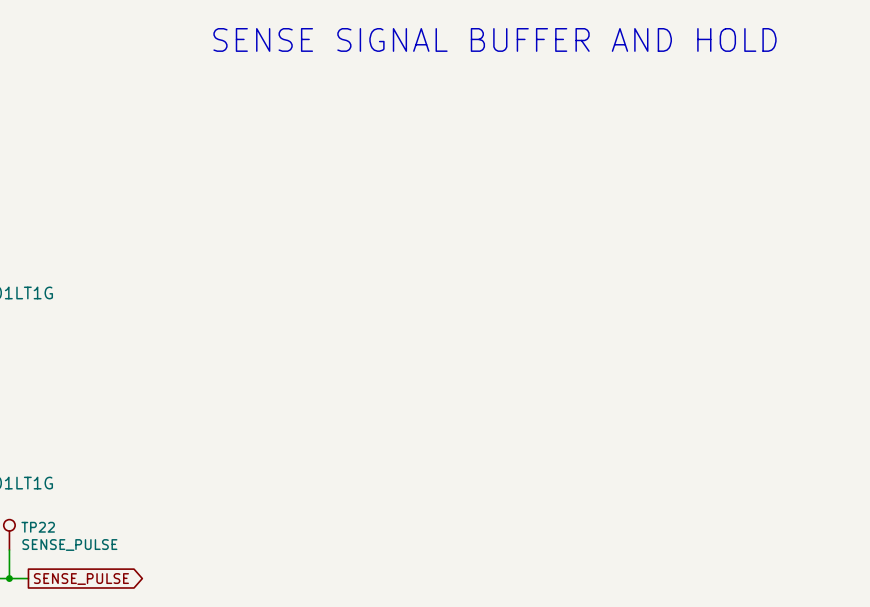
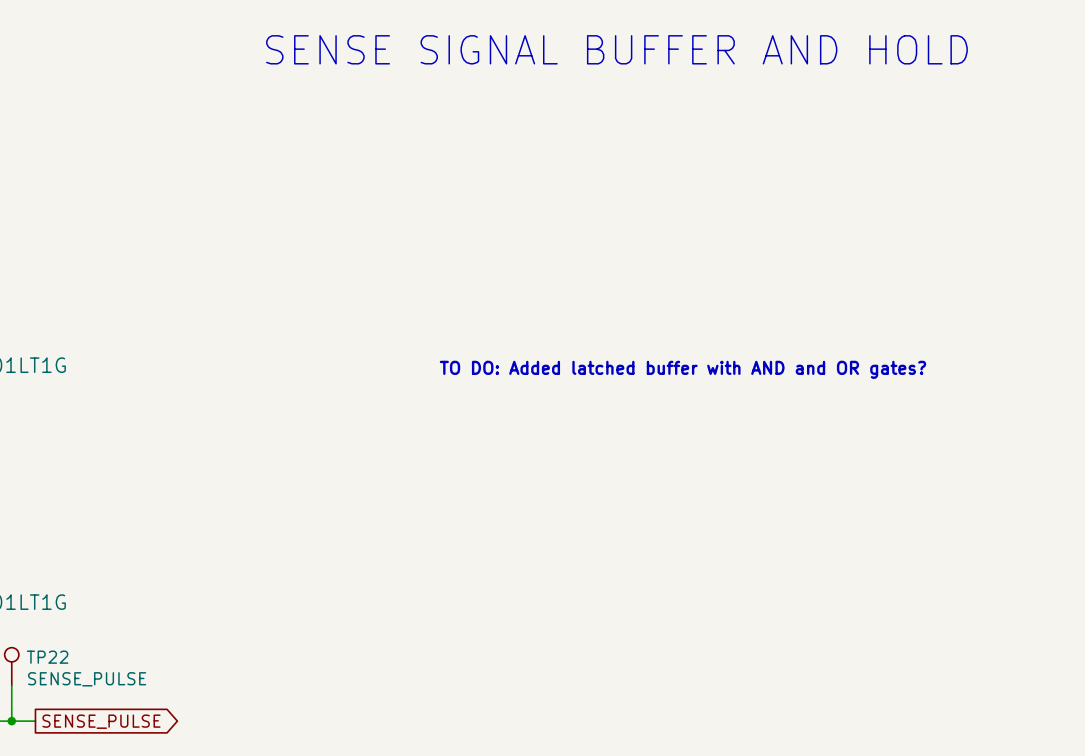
text: none -> TO DO: Added latched buffer with AND and OR gates? (682, 369)

